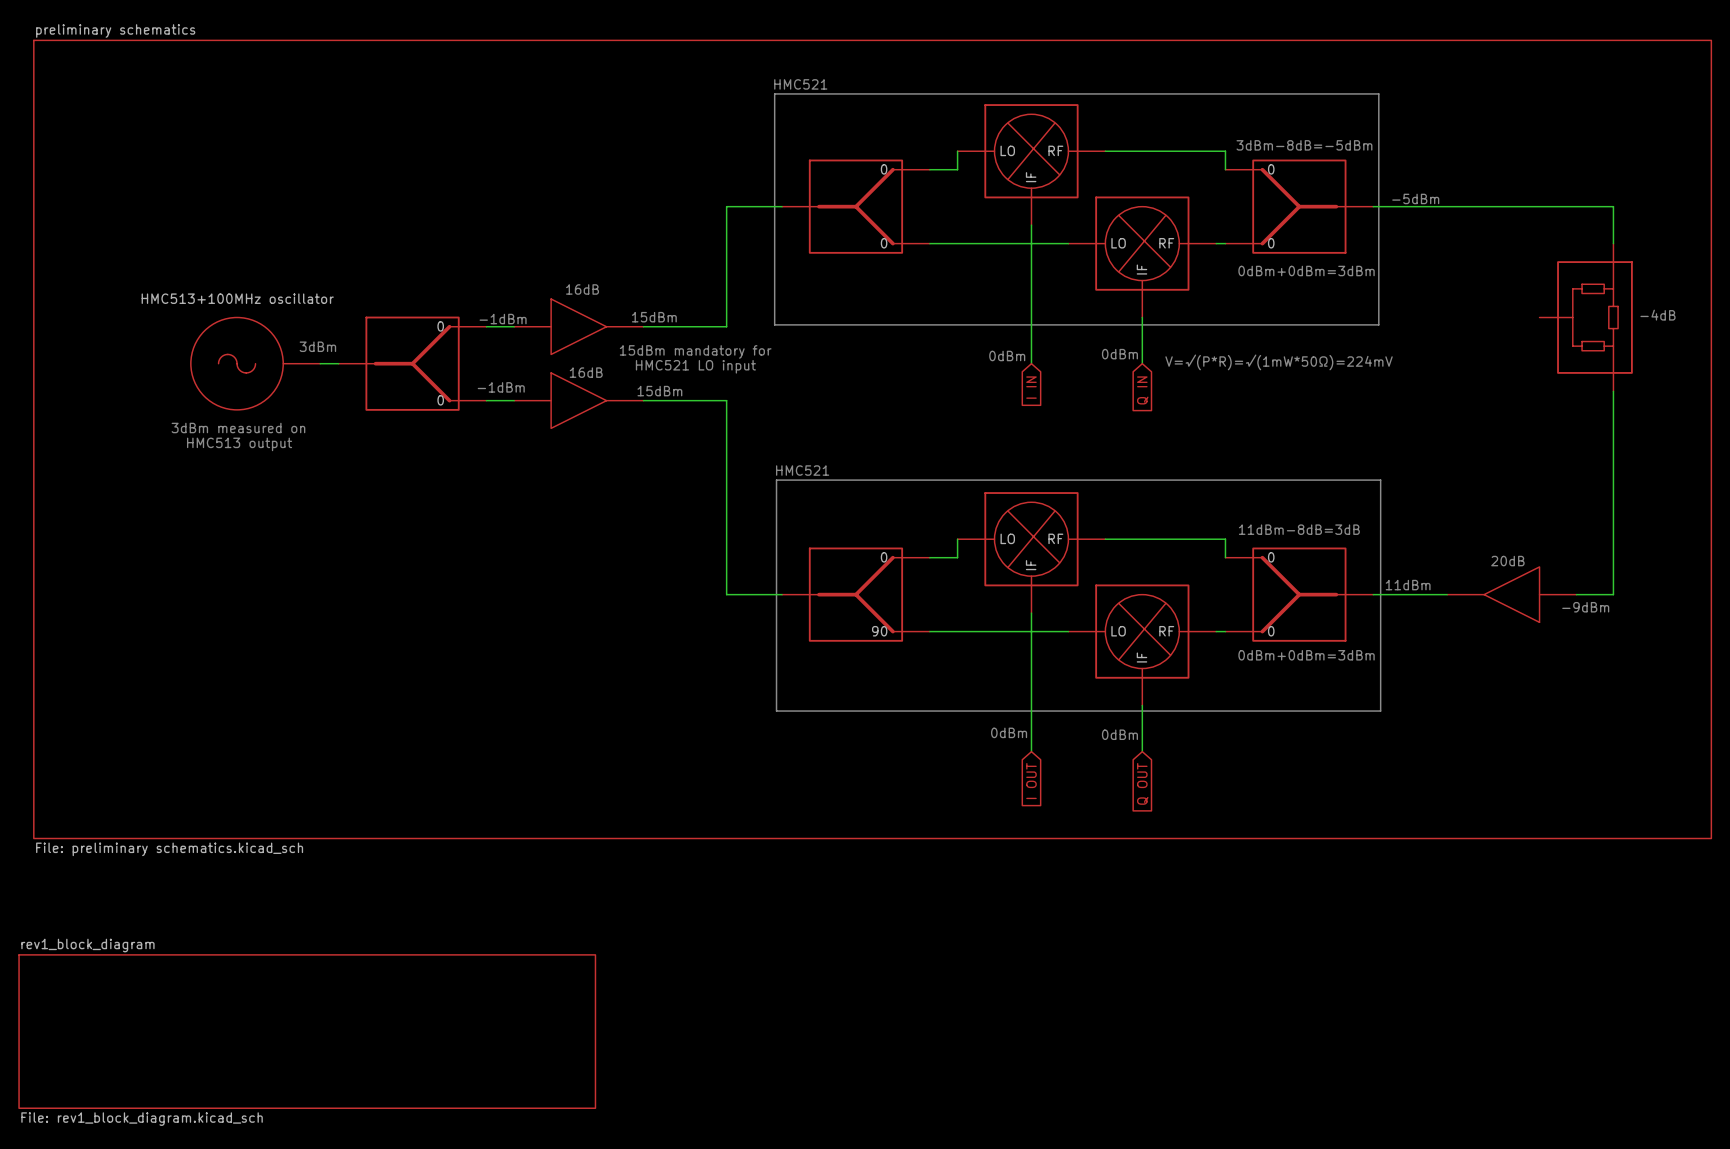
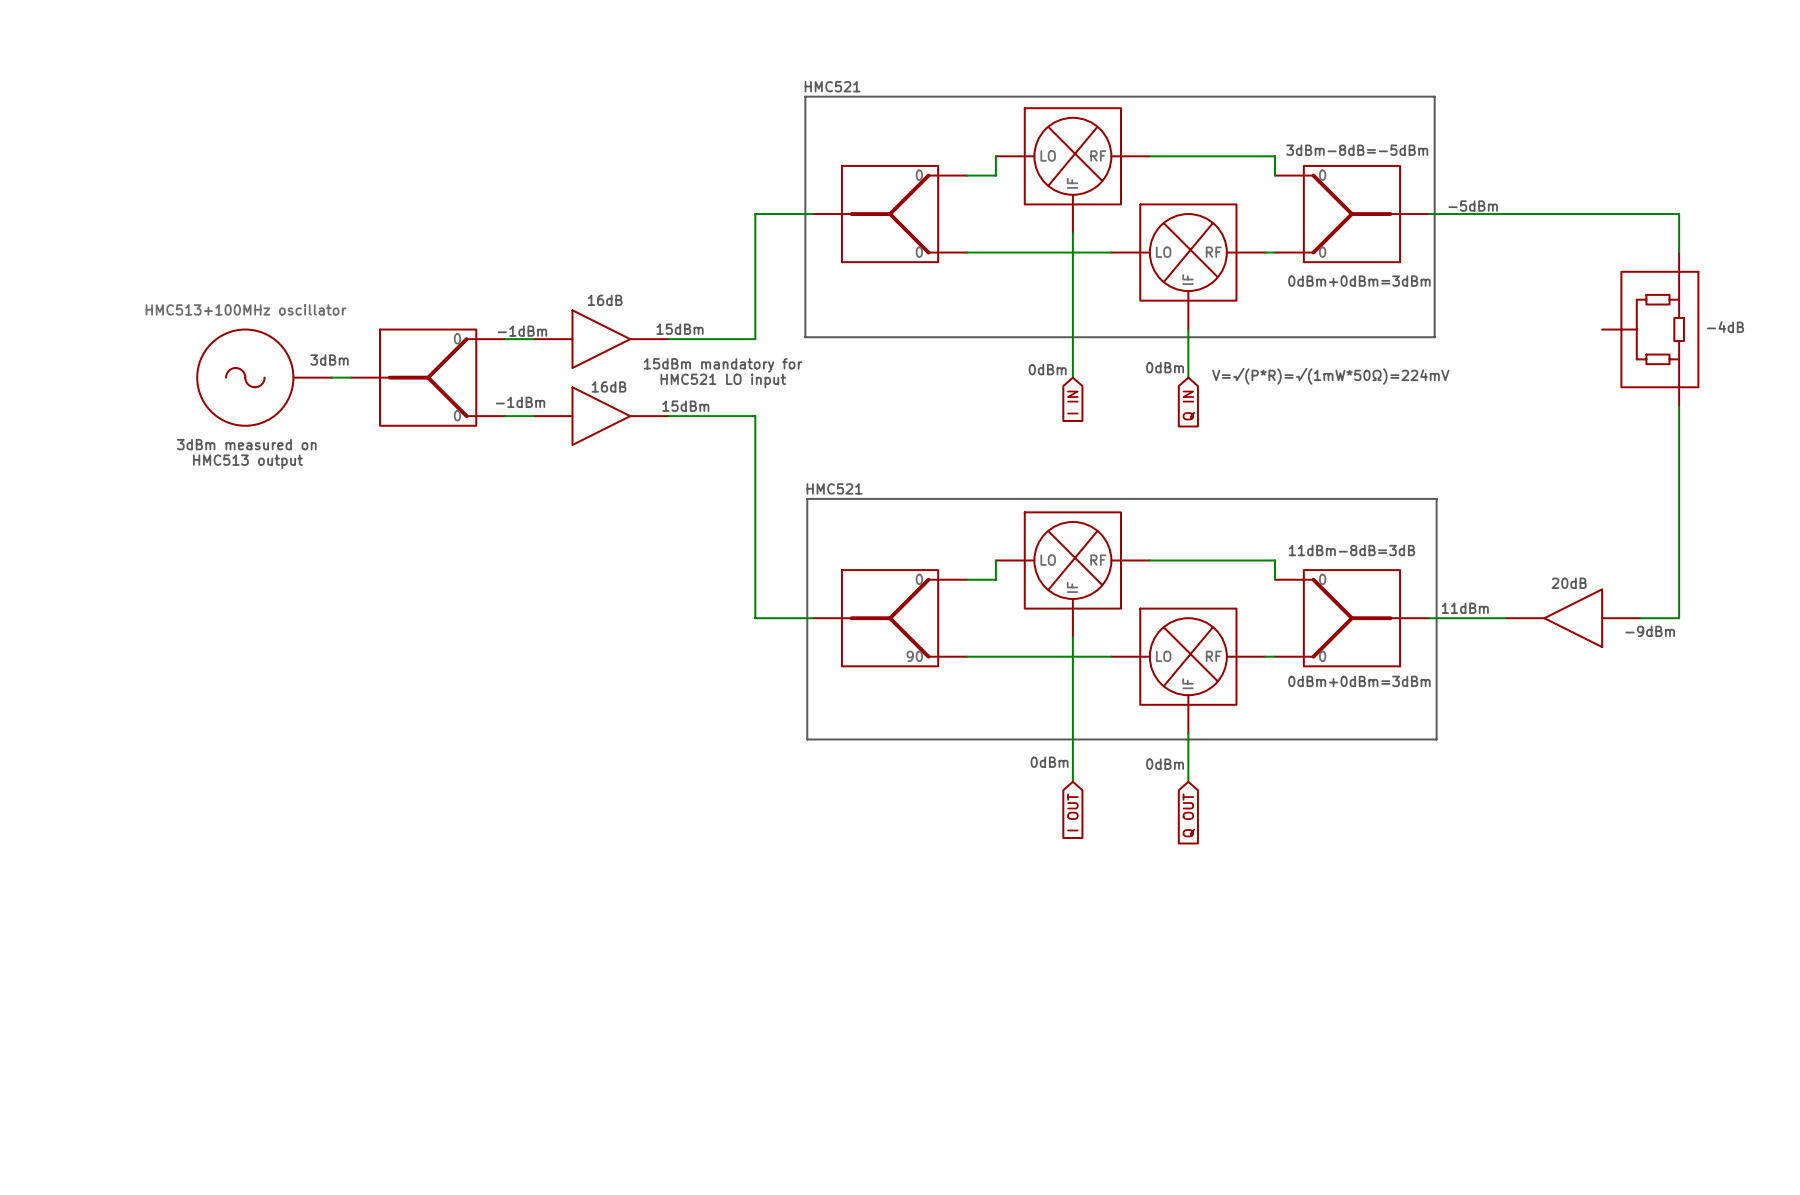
sheet preliminary schematics: File: preliminary schematics.kicad_sch (872, 439) -> none
sheet rev1_block_diagram: File: rev1_block_diagram.kicad_sch (307, 1031) -> none

